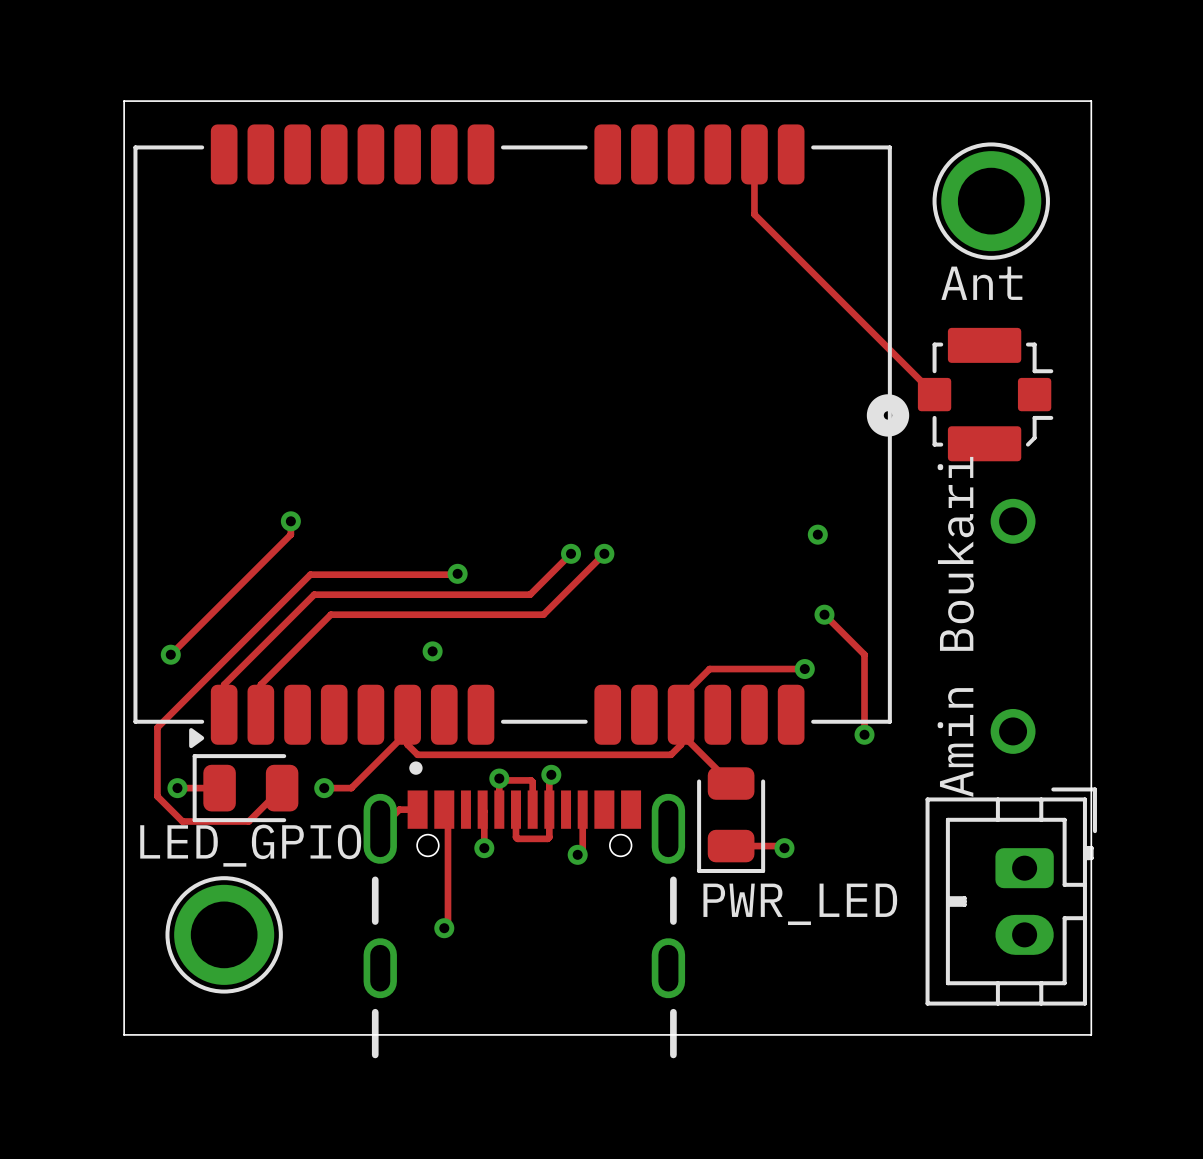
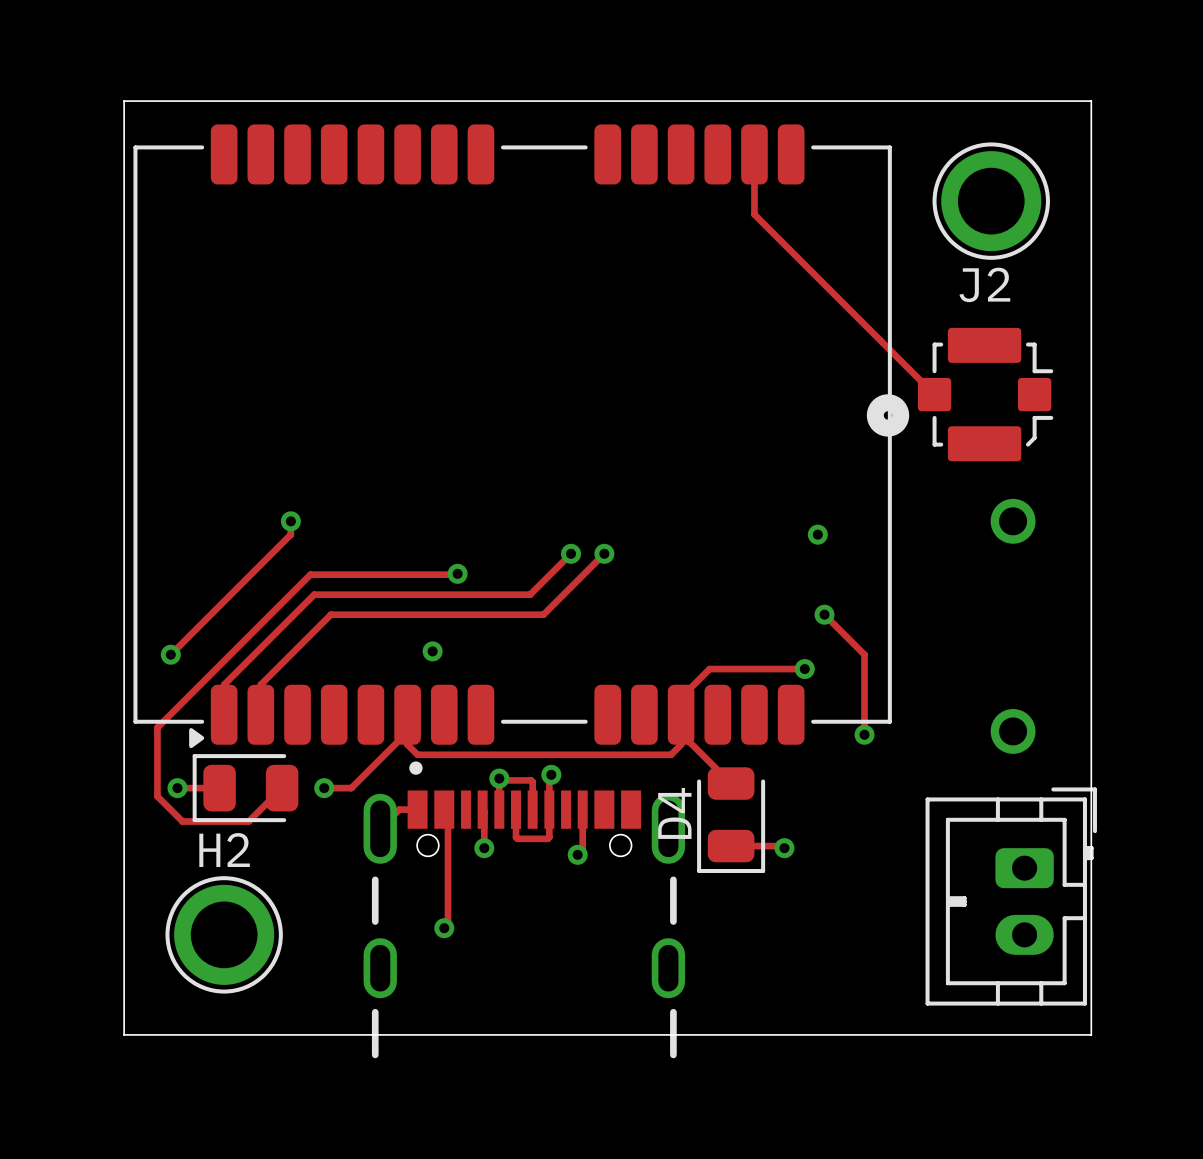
Ant name: Ant (981, 283) -> J2 (984, 284)
text: Amin Boukari (955, 626) -> none
text: LED_GPIO (250, 845) -> none
H2 name: none -> H2 (224, 850)
PWR_LED name: PWR_LED (800, 904) -> D4 (674, 813)

